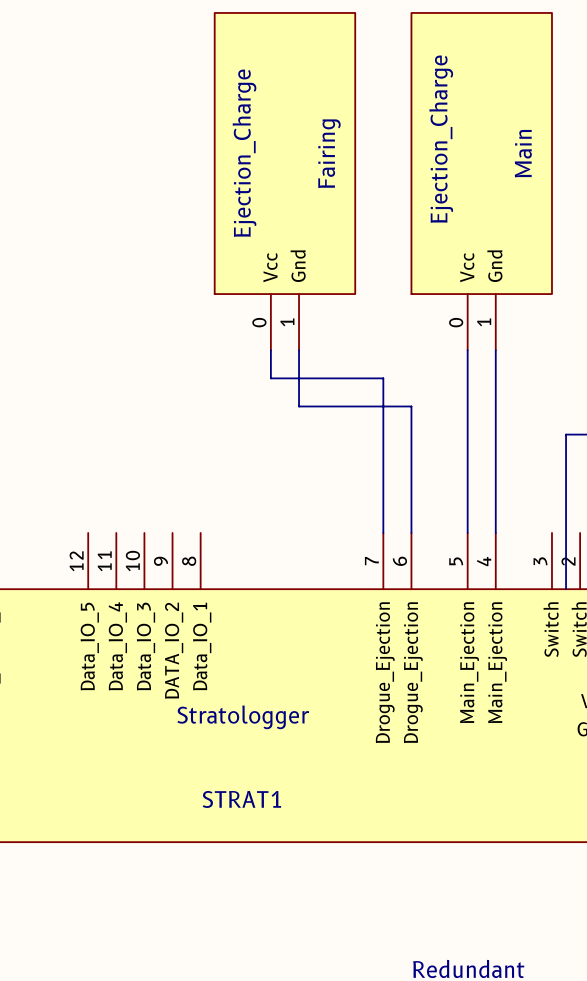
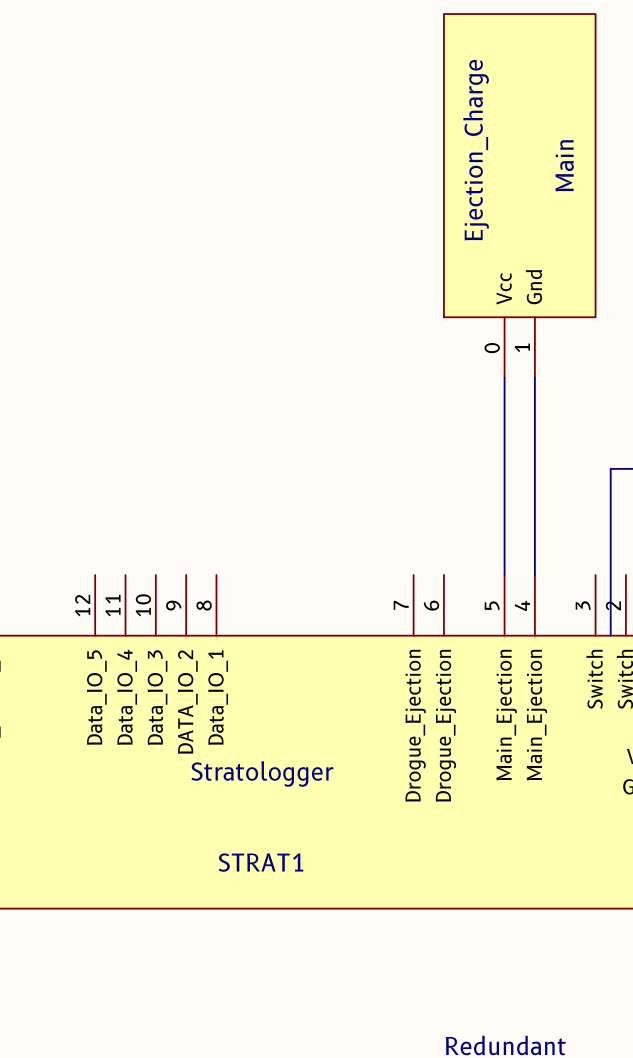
Fairing: Ejection_Charge (284, 181) -> none
wire: (270, 350) (270, 378) (383, 378) (383, 532) -> none
wire: (299, 350) (299, 406) (411, 406) (411, 532) -> none

